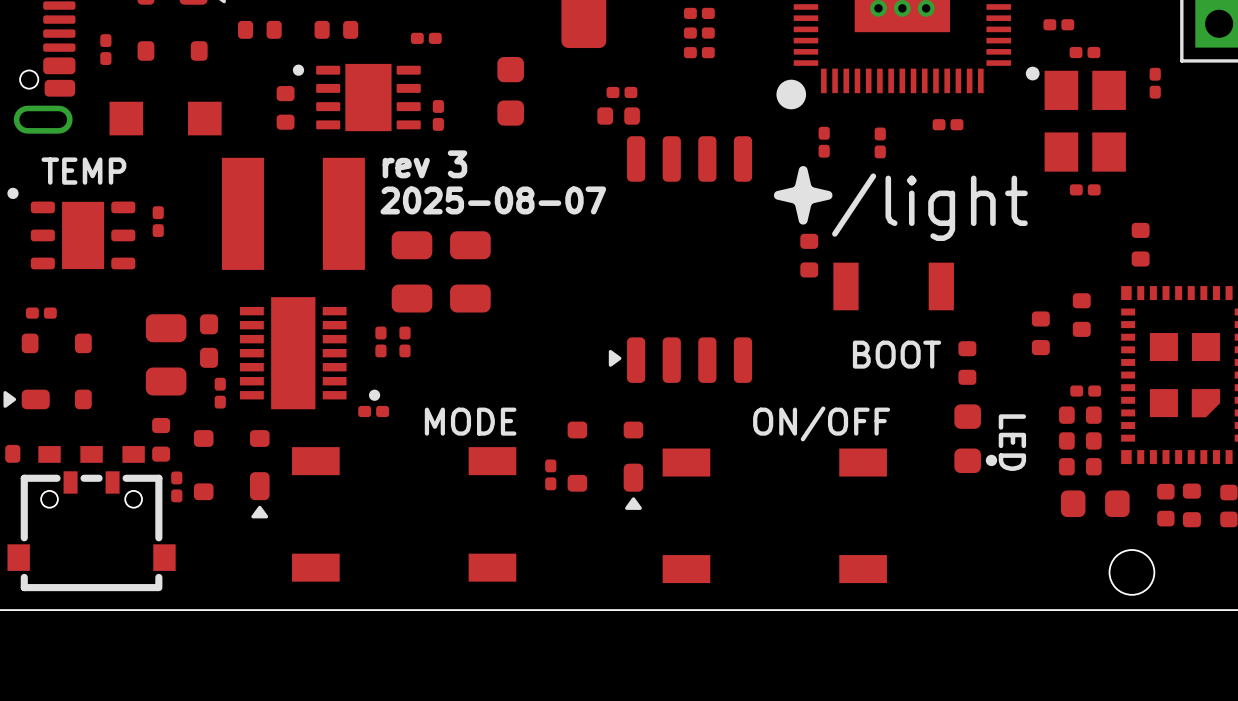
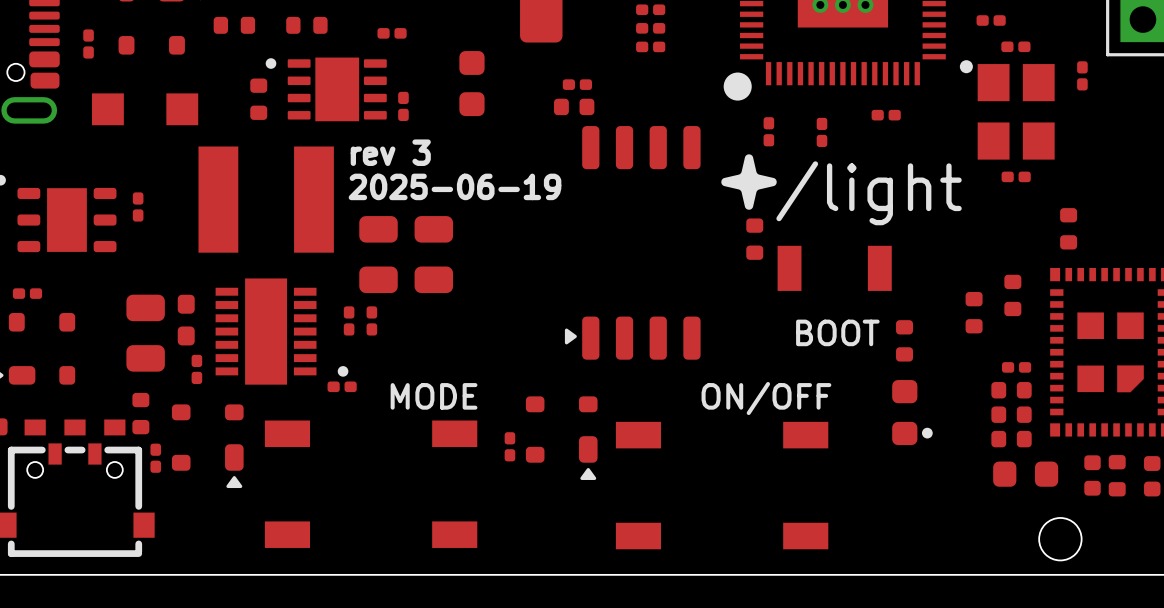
text: TEMP (83, 171) -> none
text: 2025-08-07 (493, 200) -> 2025-06-19 (454, 186)
text: LED (1012, 442) -> none

